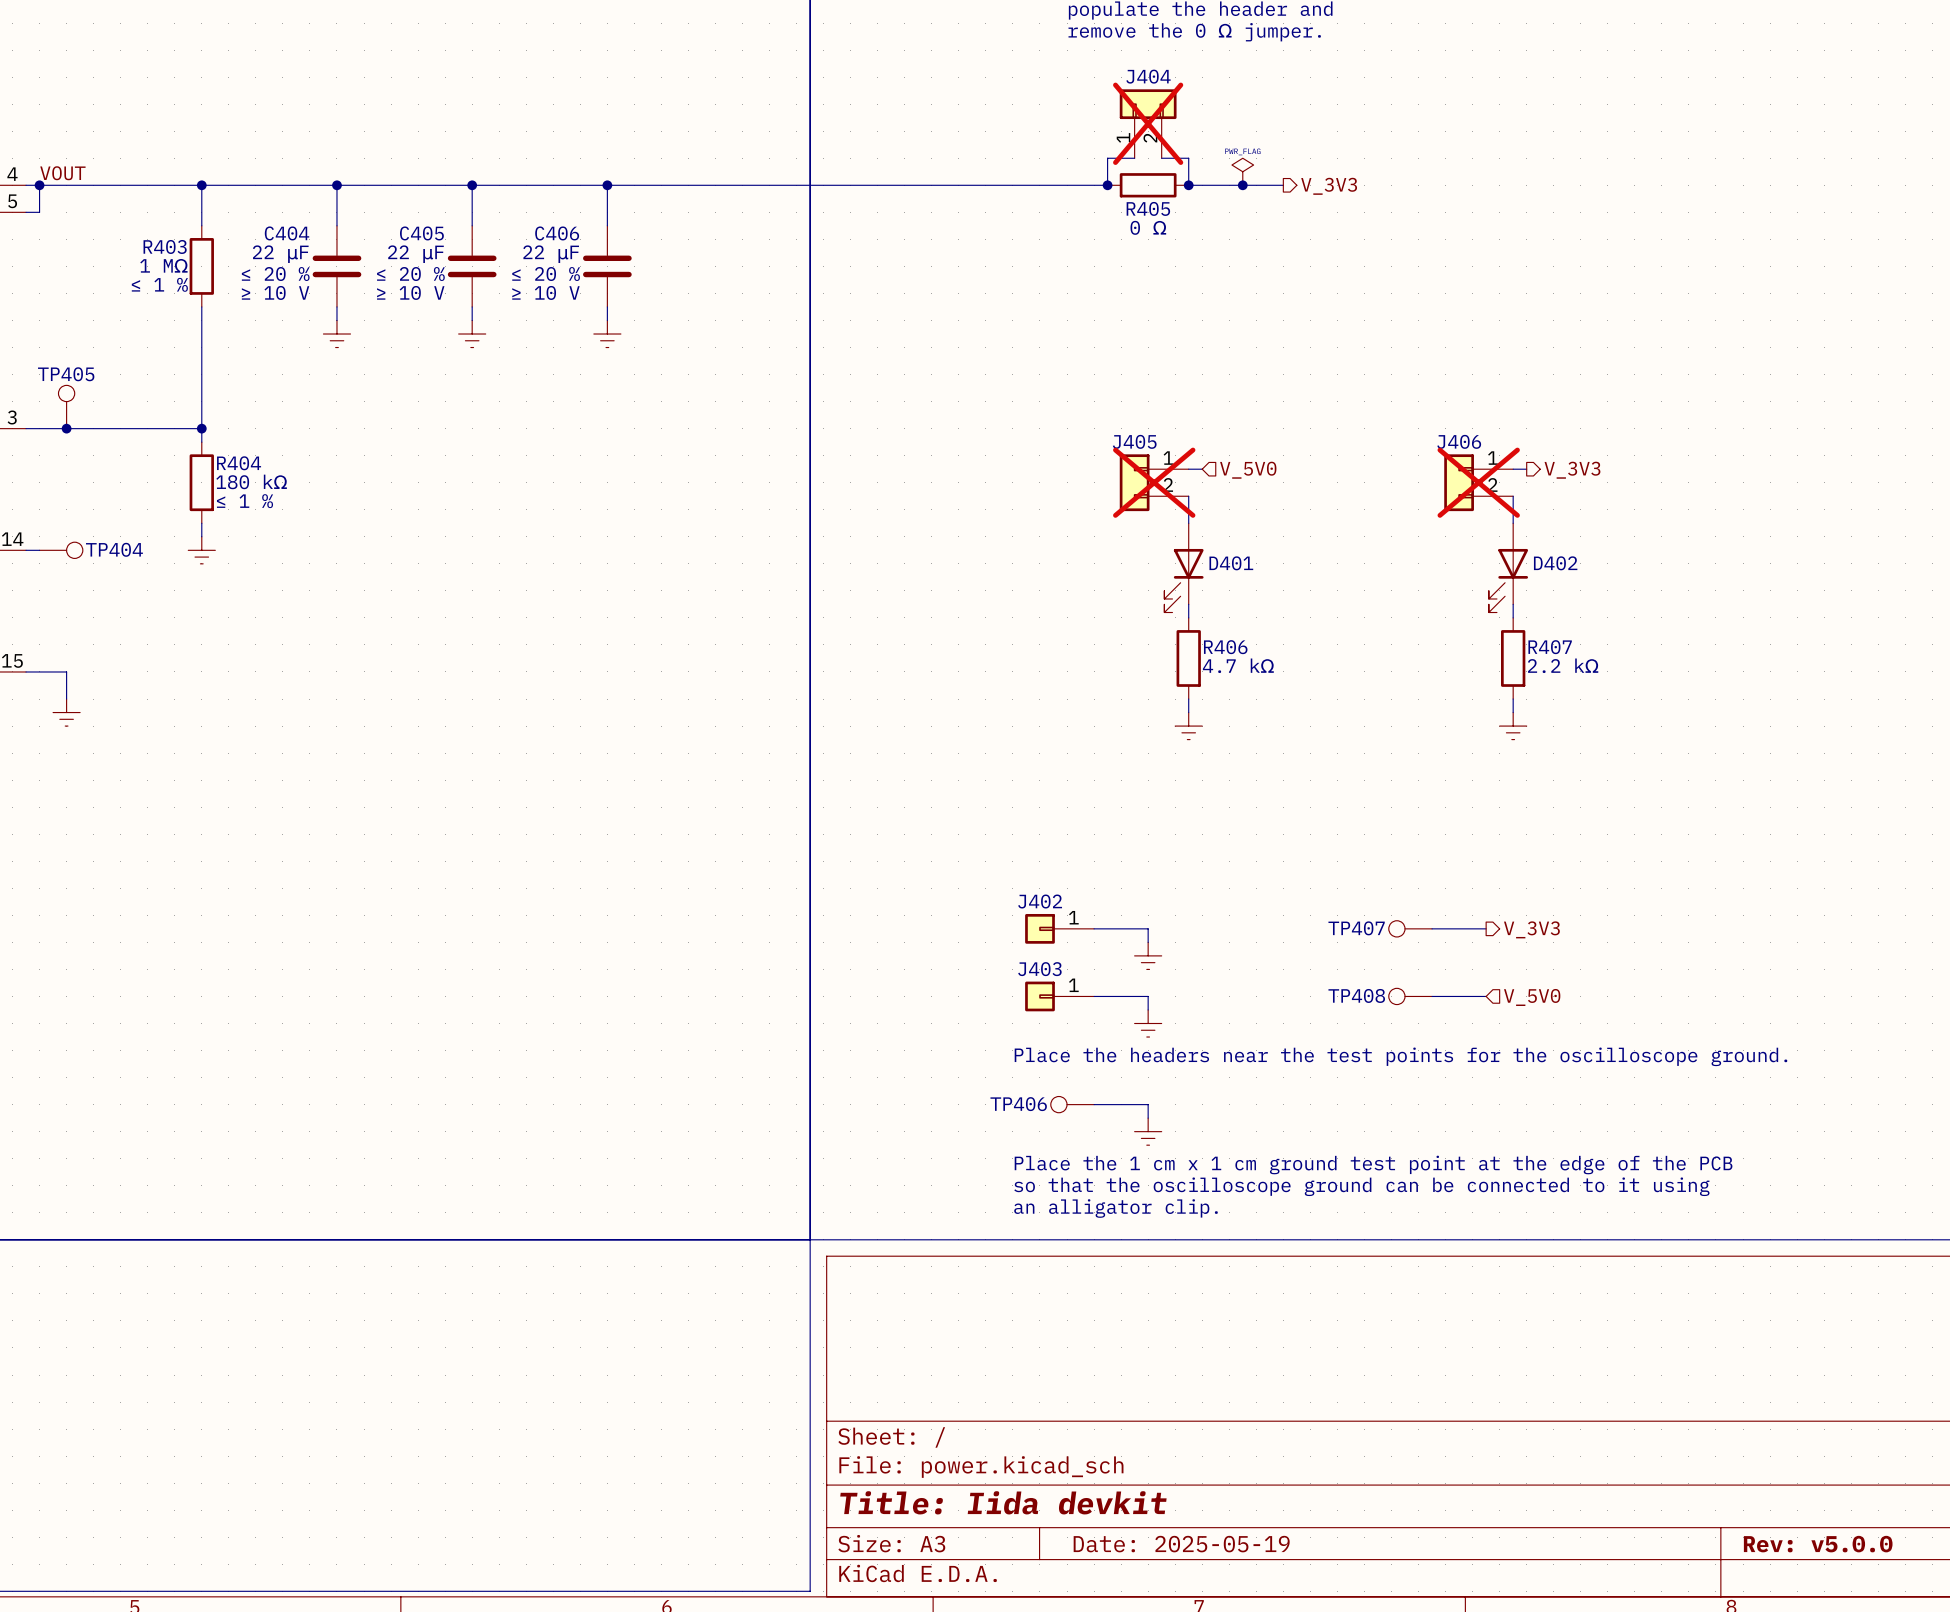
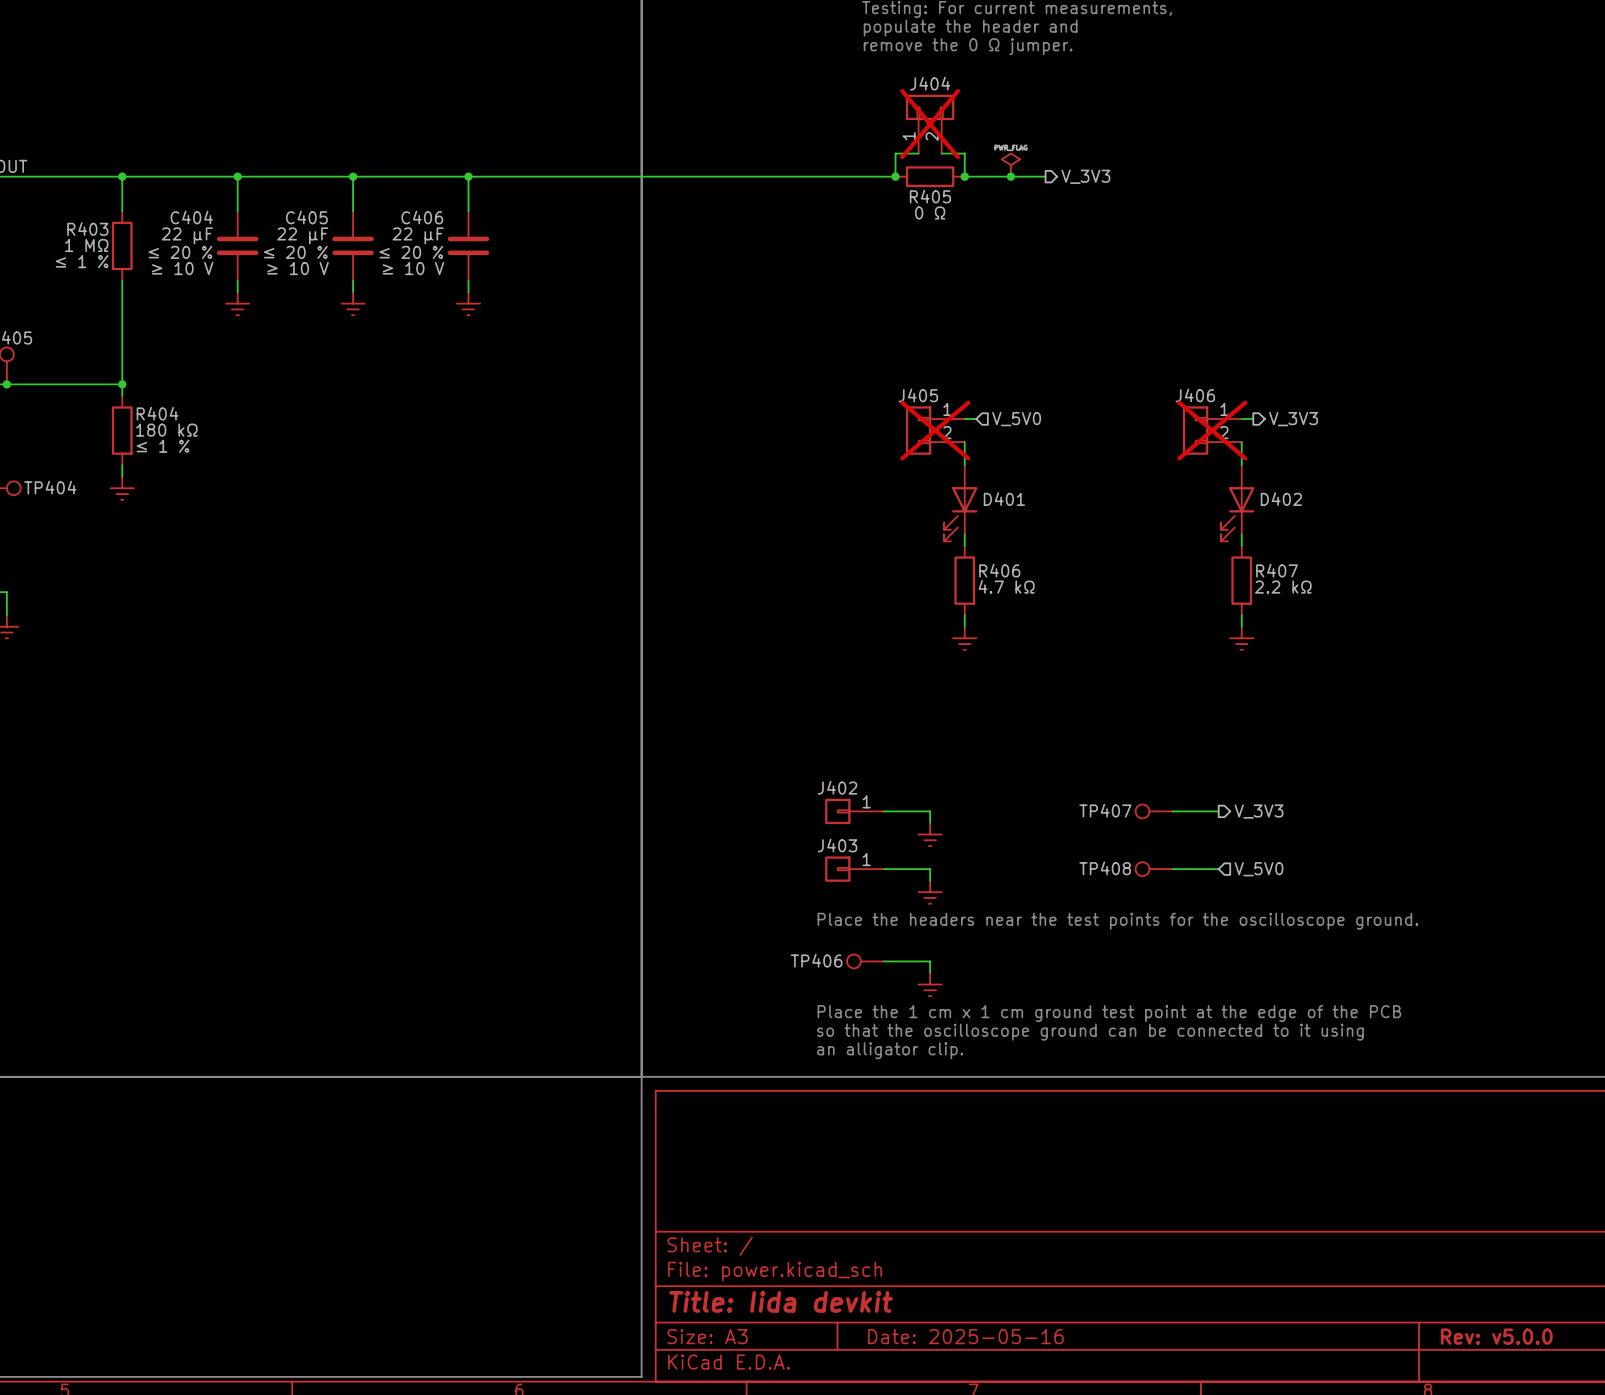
title block: Date: 2025-05-19 (1181, 1544) -> Date: 2025-05-16 (965, 1336)

